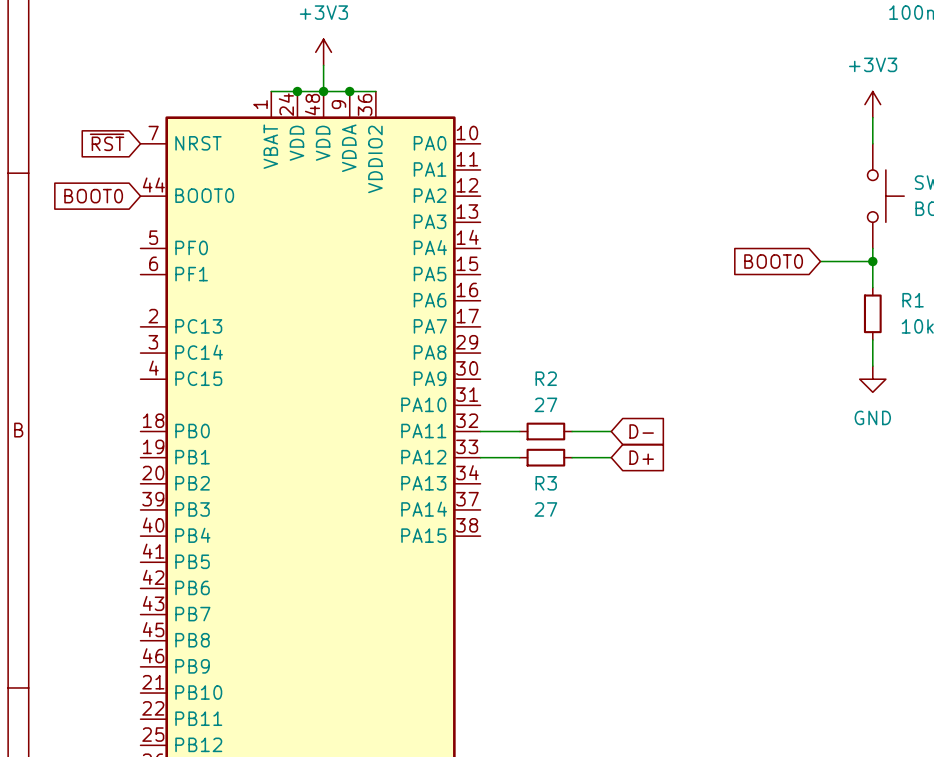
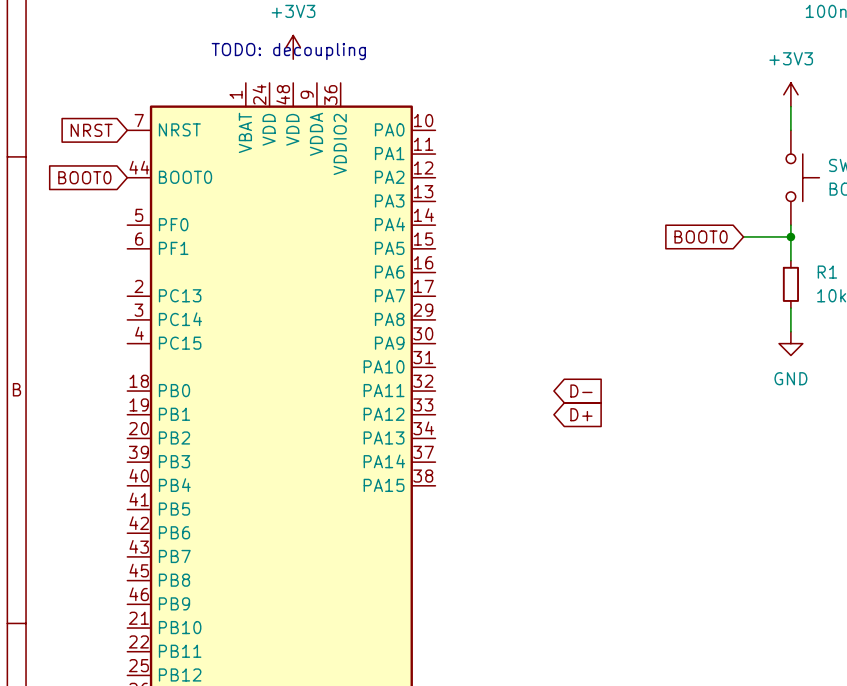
text: none -> TODO: decoupling (288, 51)
wire: (323, 65) (323, 91) -> none
wire: (271, 91) (375, 91) -> none
junction: (297, 91) -> none
junction: (323, 91) -> none
junction: (349, 91) -> none
global label: ~{RST} (107, 142) -> NRST (91, 130)
wire: (480, 431) (519, 431) -> none
R2: 27 (545, 431) -> none
wire: (572, 431) (611, 431) -> none
wire: (480, 457) (519, 457) -> none
R3: 27 (545, 457) -> none
wire: (572, 457) (611, 457) -> none

